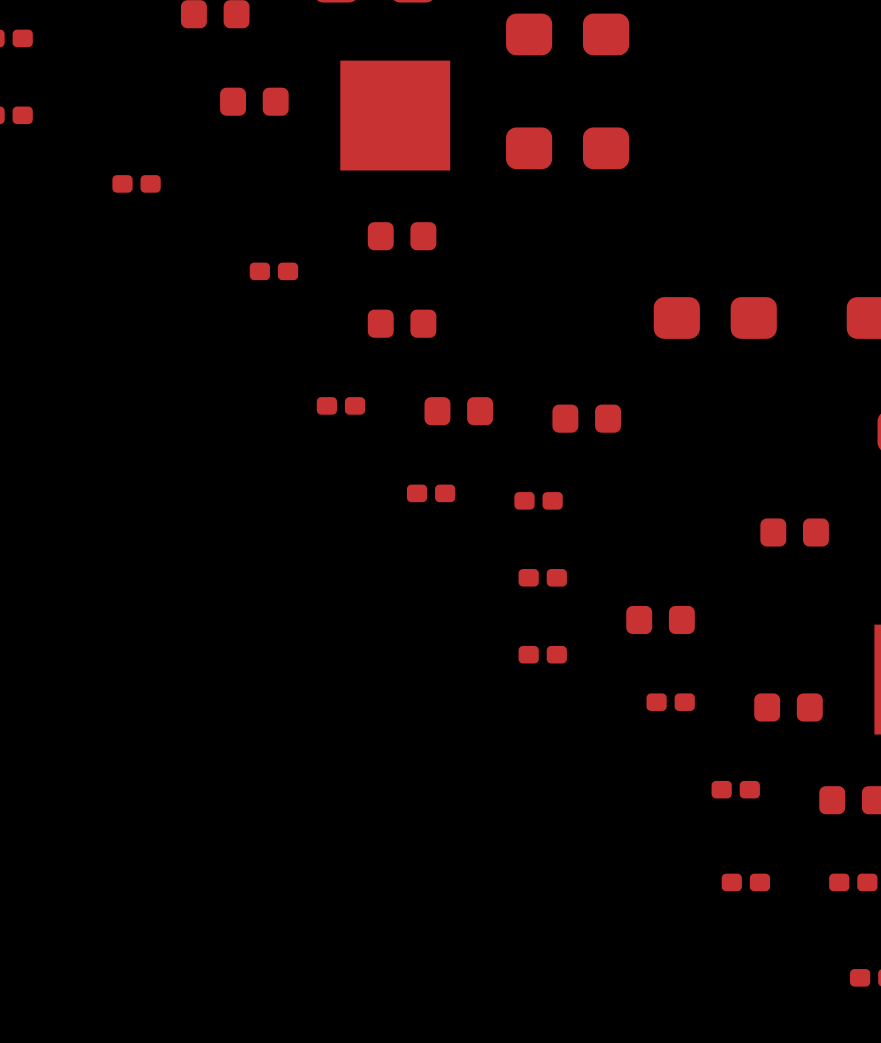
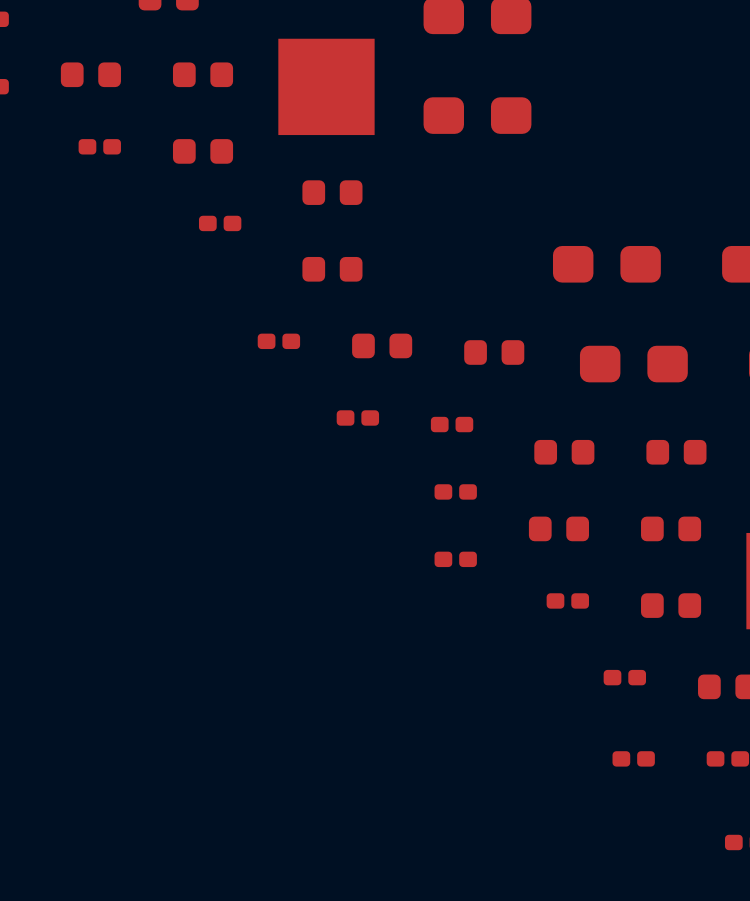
part: none -> (90, 74)
part: none -> (203, 151)
part: none -> (633, 364)
part: none -> (564, 452)
part: none -> (671, 528)

